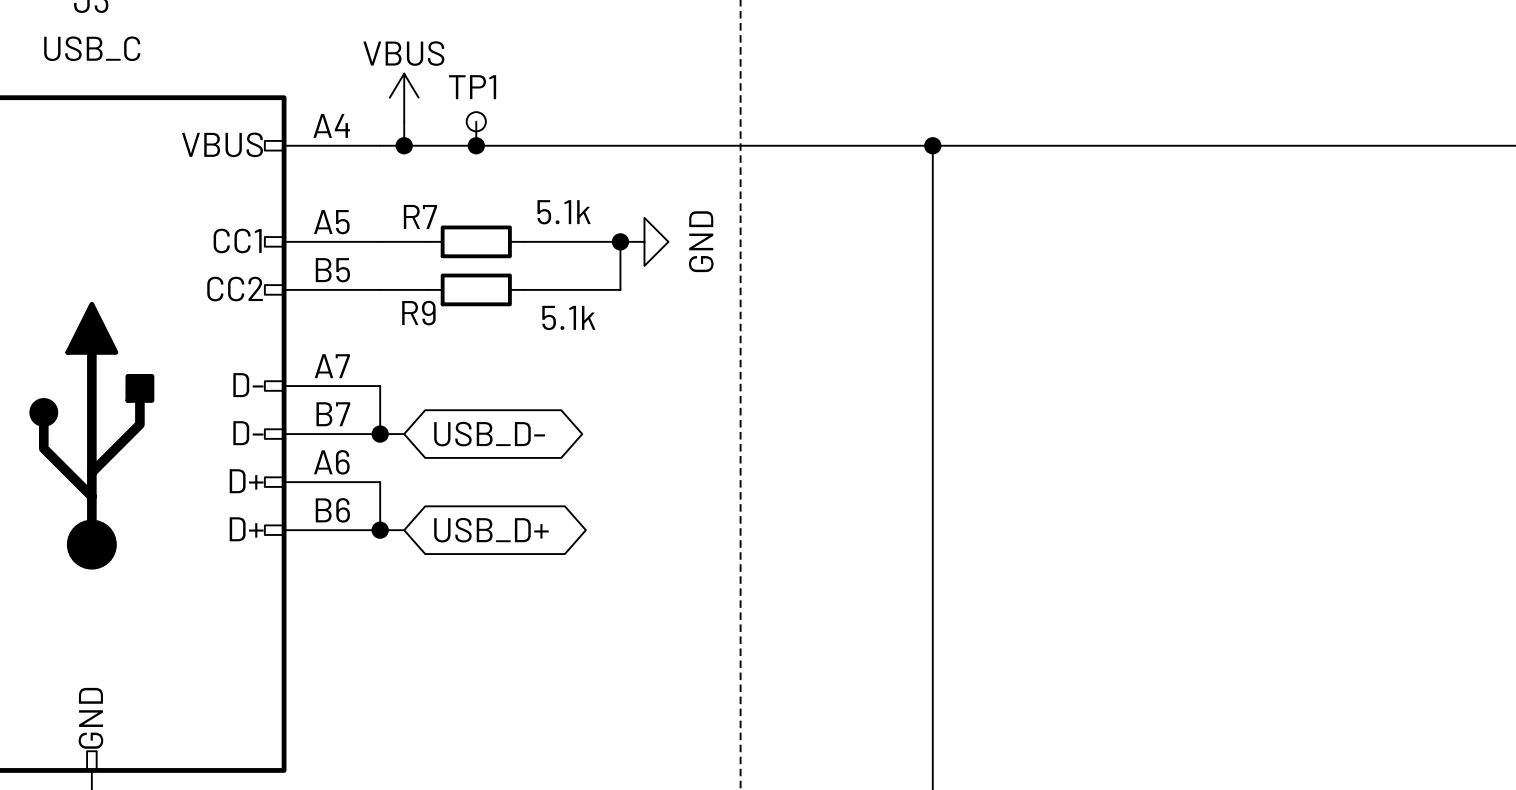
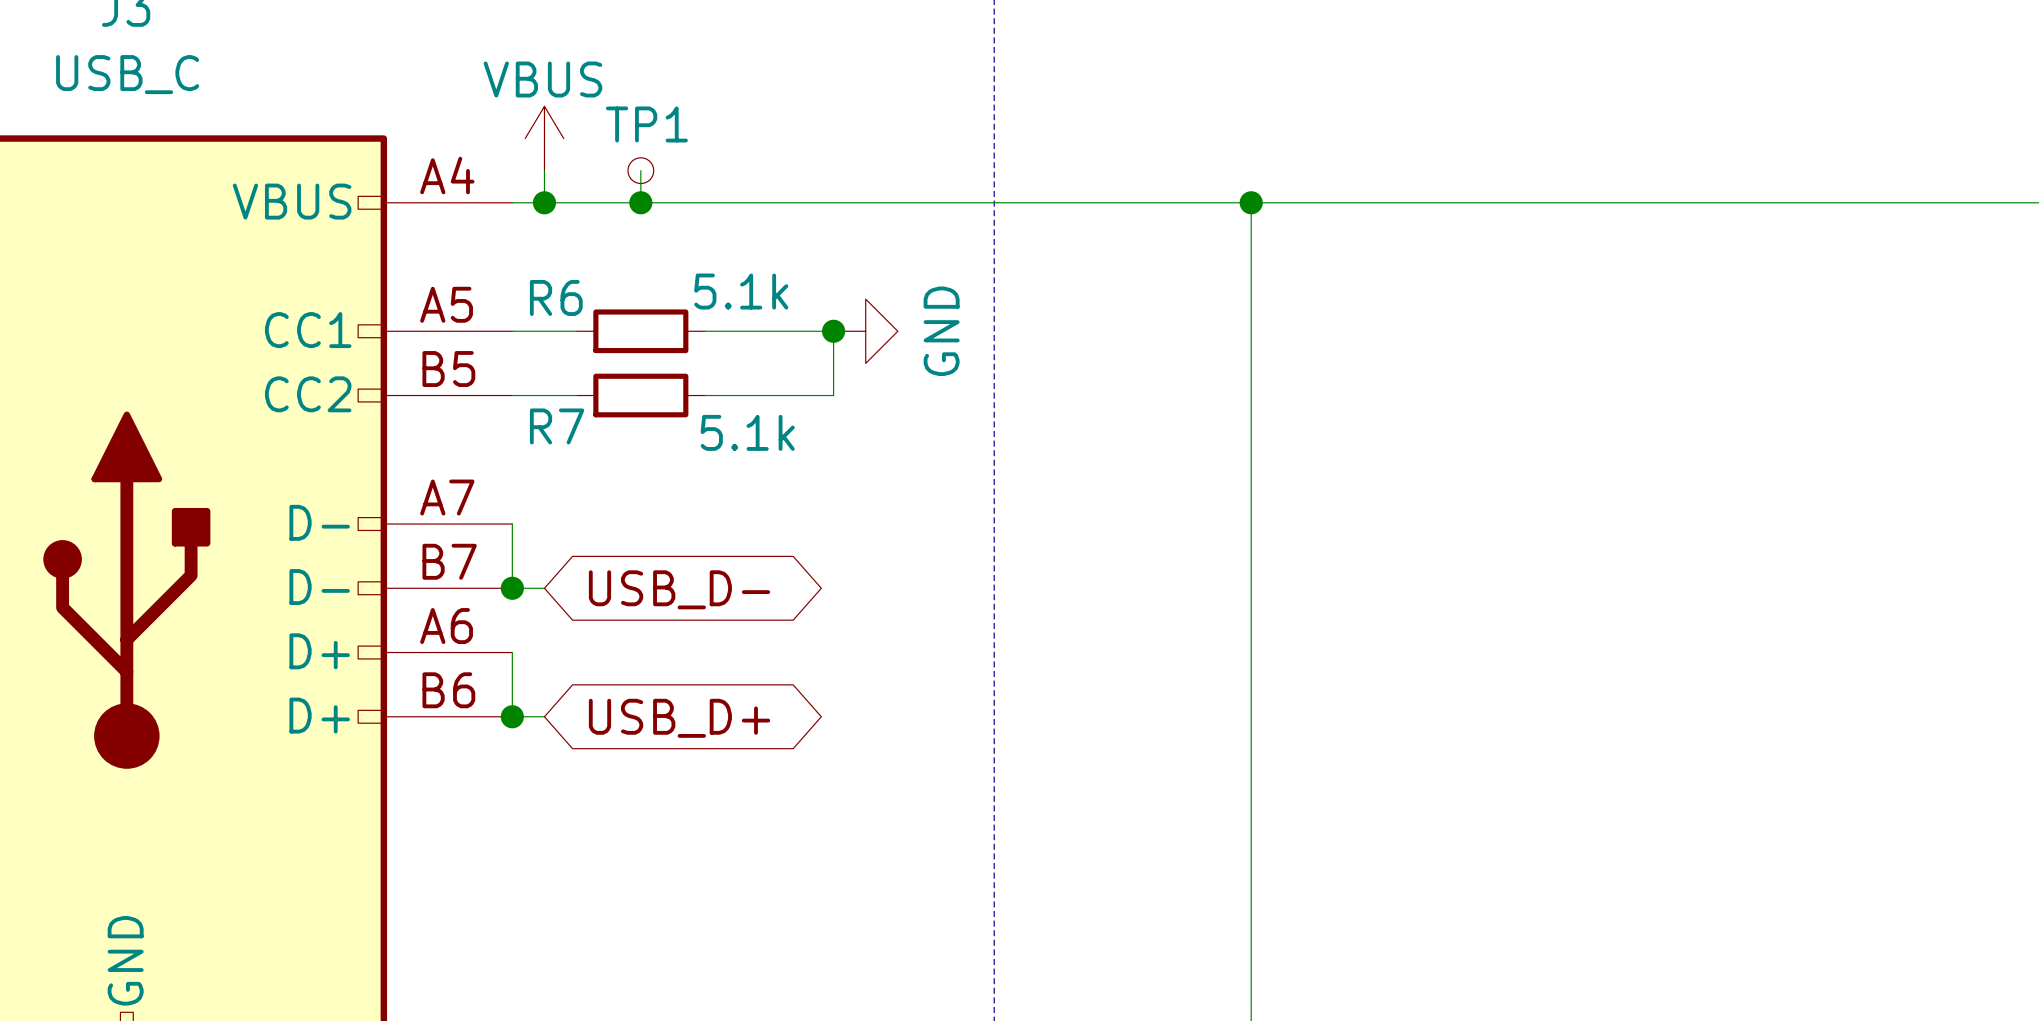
R7 name: R7 (420, 216) -> R6 (556, 297)
R9 name: R9 (418, 313) -> R7 (557, 426)

